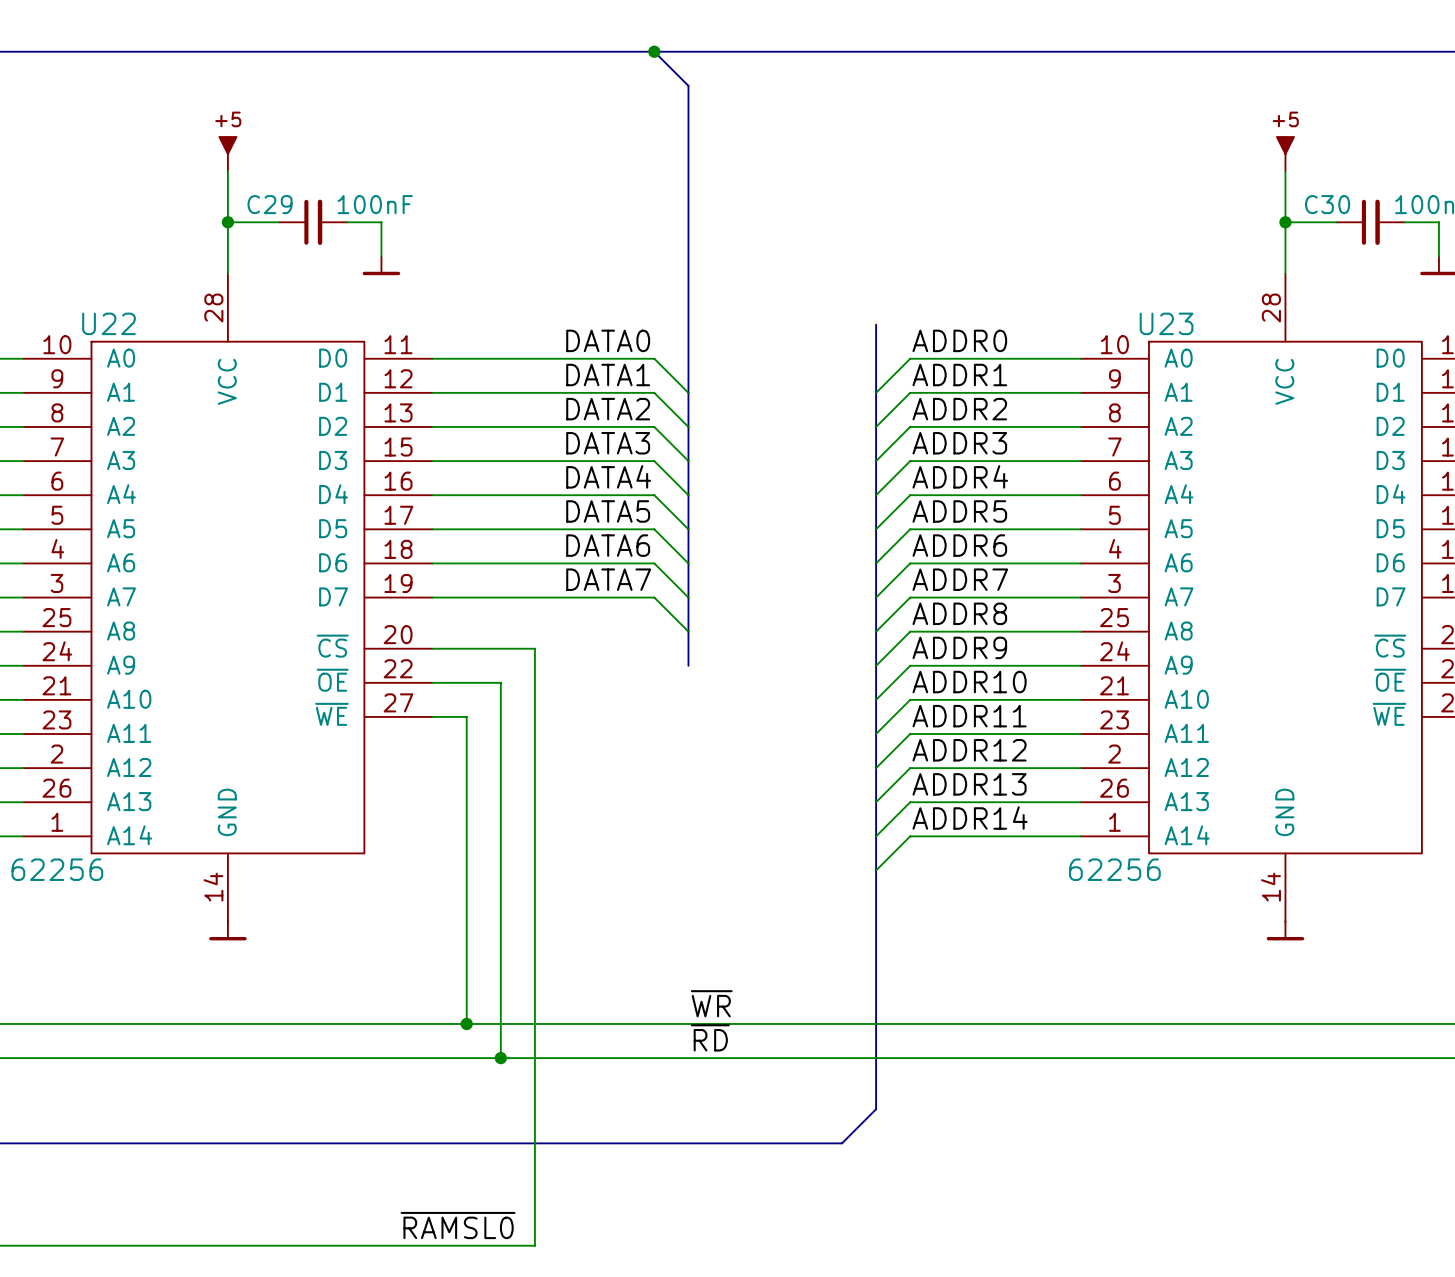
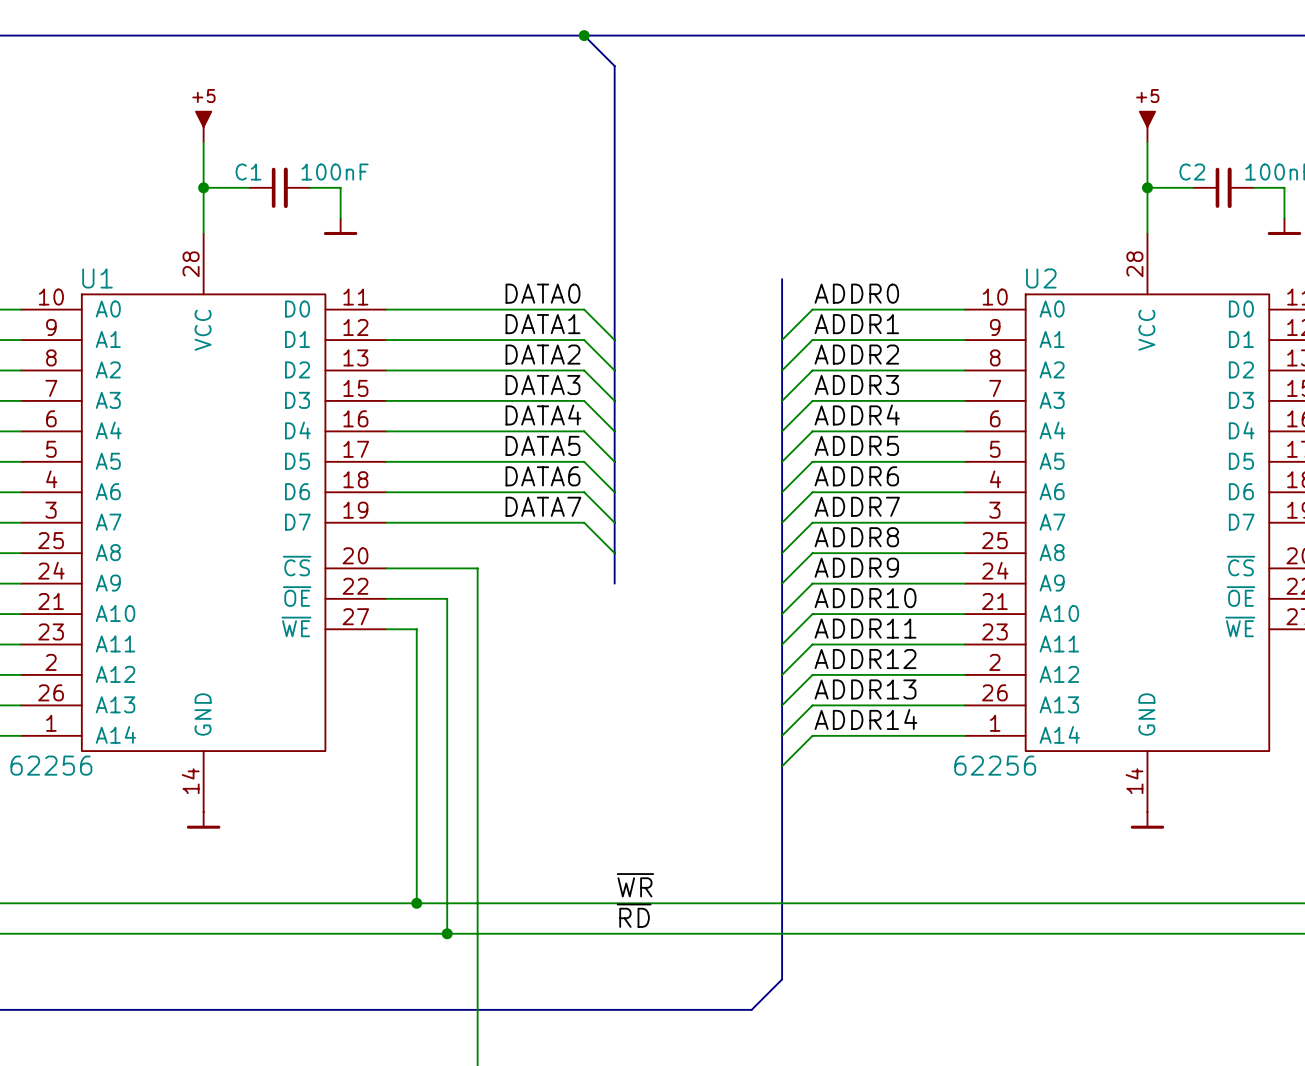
C29 name: C29 (270, 204) -> C1 (248, 172)
C30 name: C30 (1327, 204) -> C2 (1192, 172)
U22 name: U22 (109, 323) -> U1 (97, 278)
U23 name: U23 (1166, 323) -> U2 (1041, 278)

